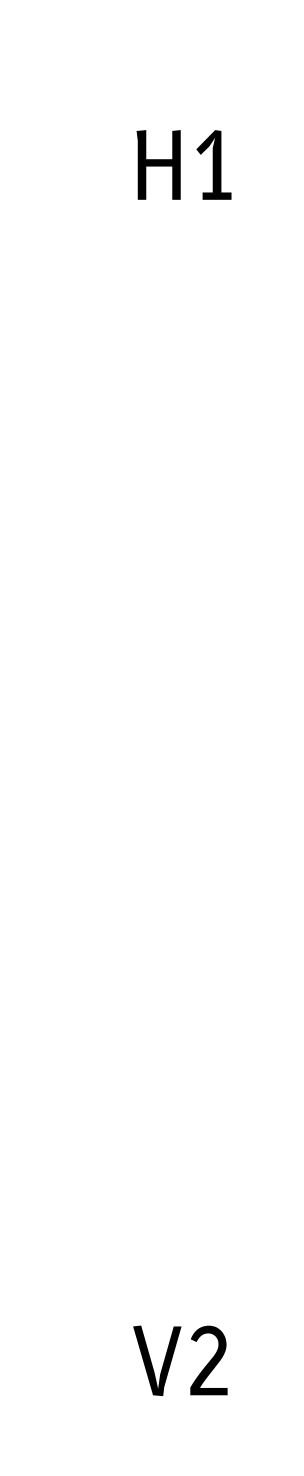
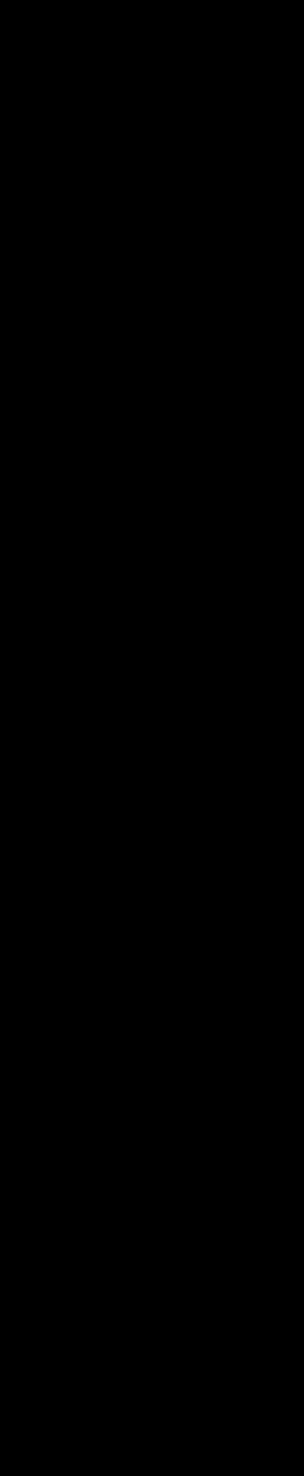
label: H1 (184, 164) -> none
label: V2 (180, 1360) -> none

